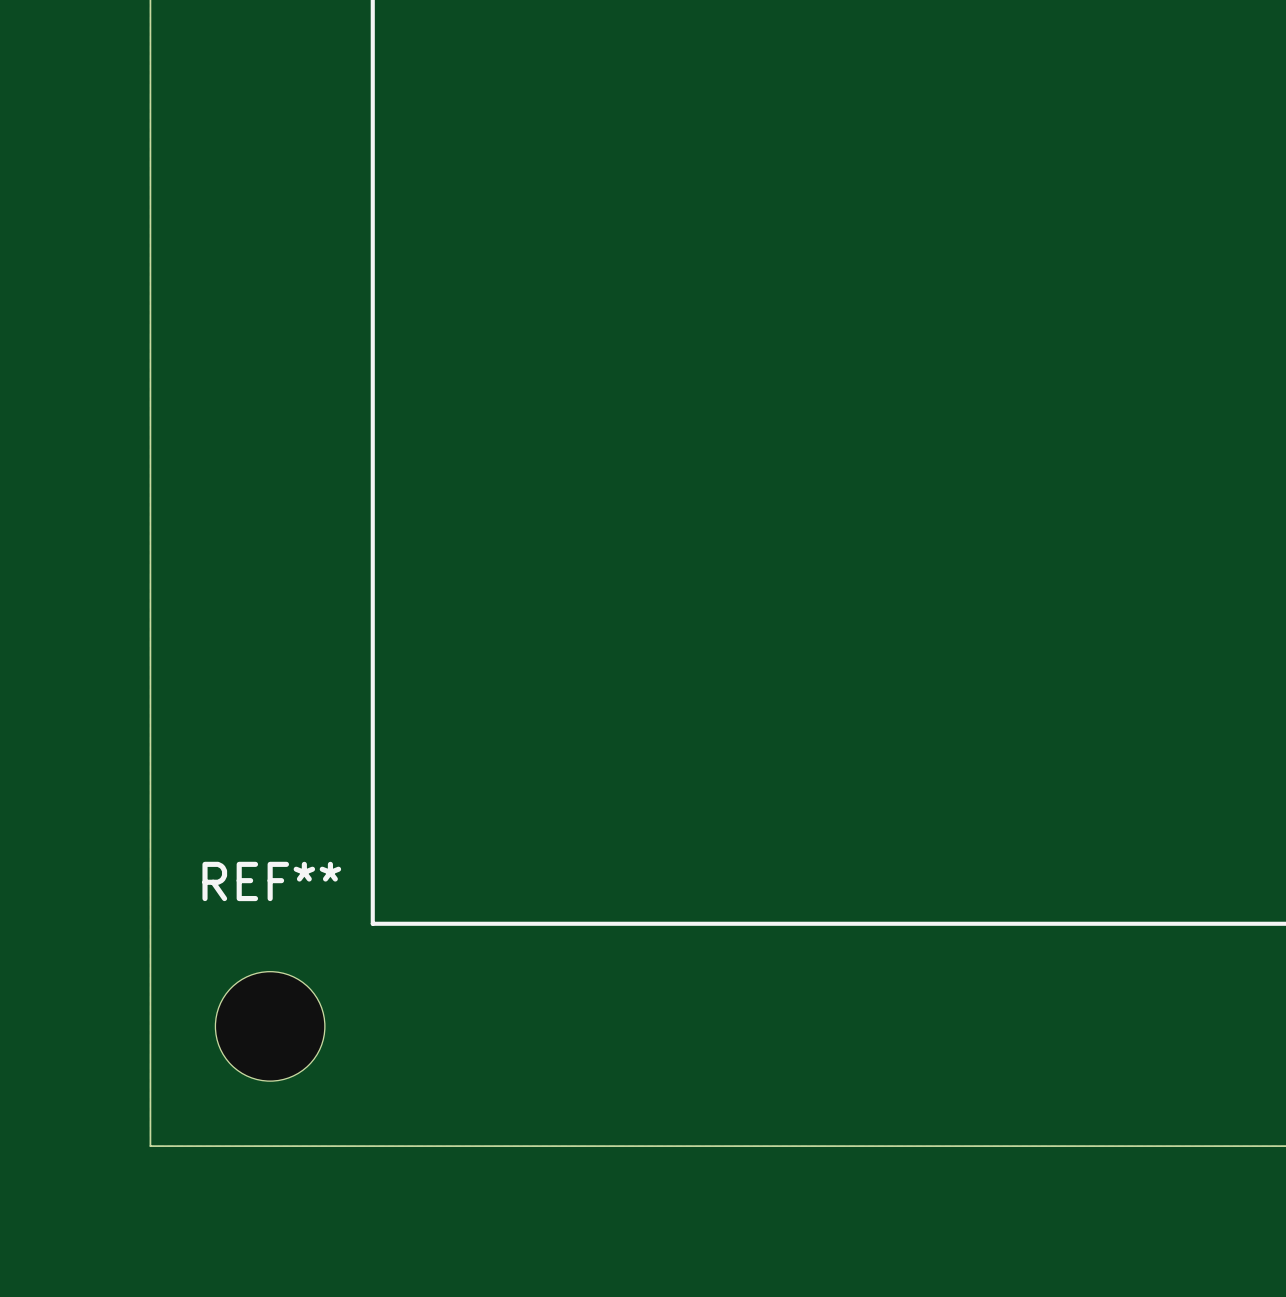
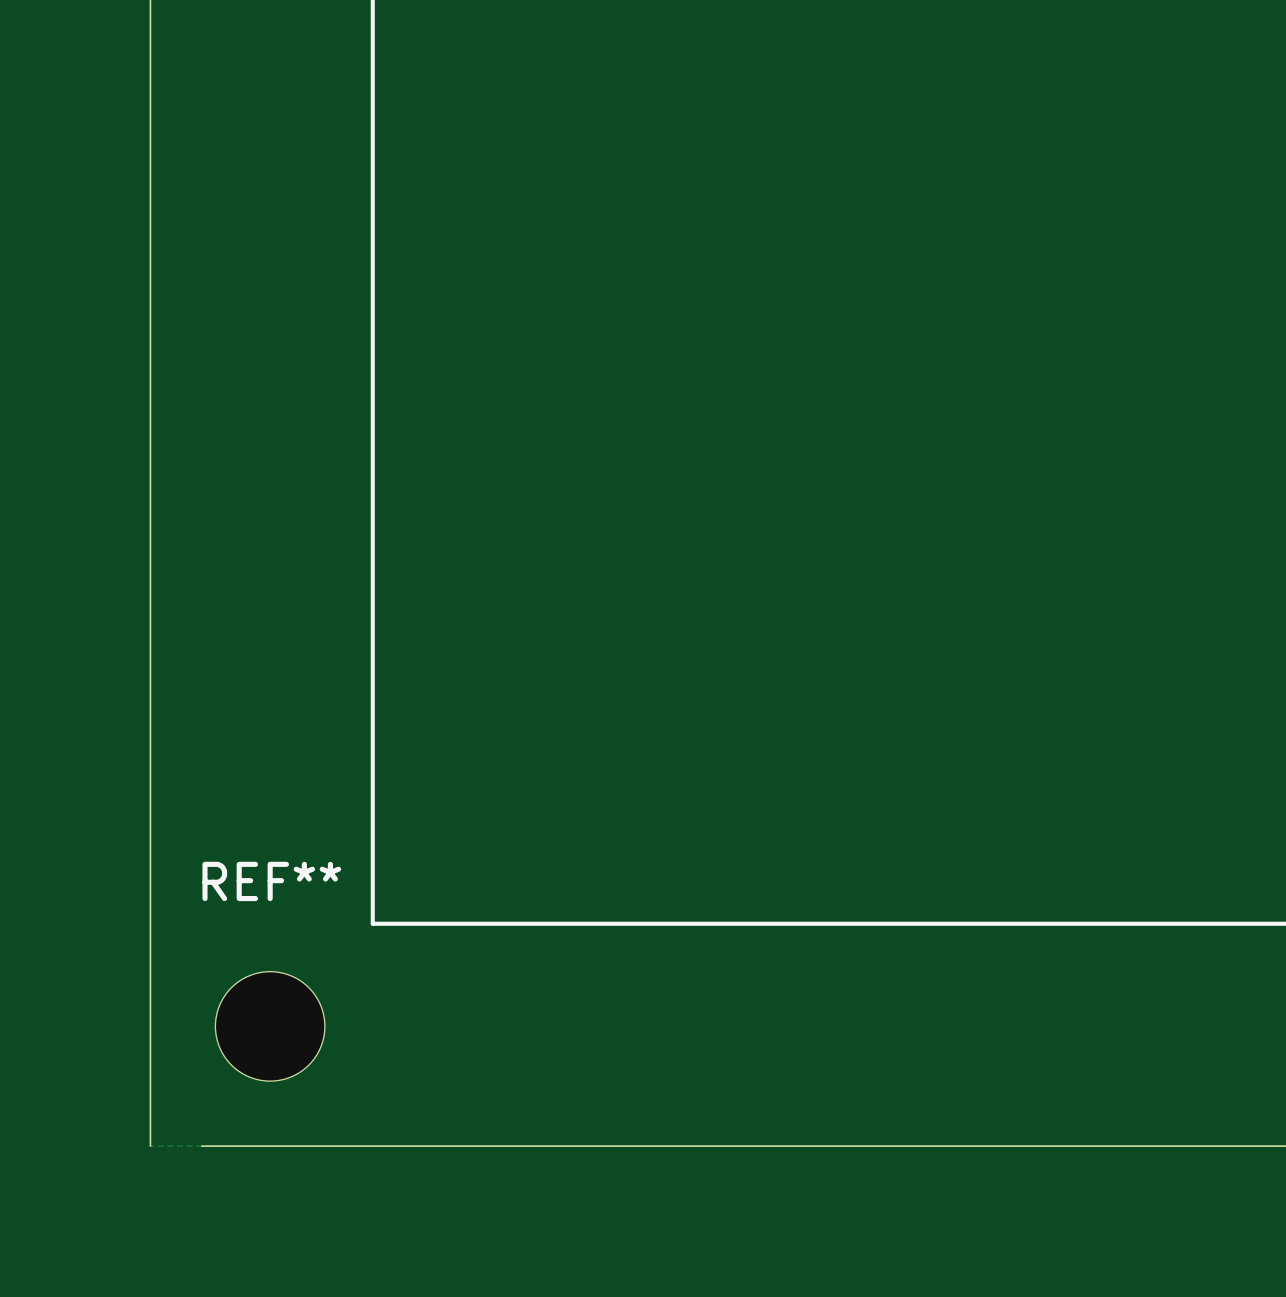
board edge: (150, 1146) (201, 1146) -> none

